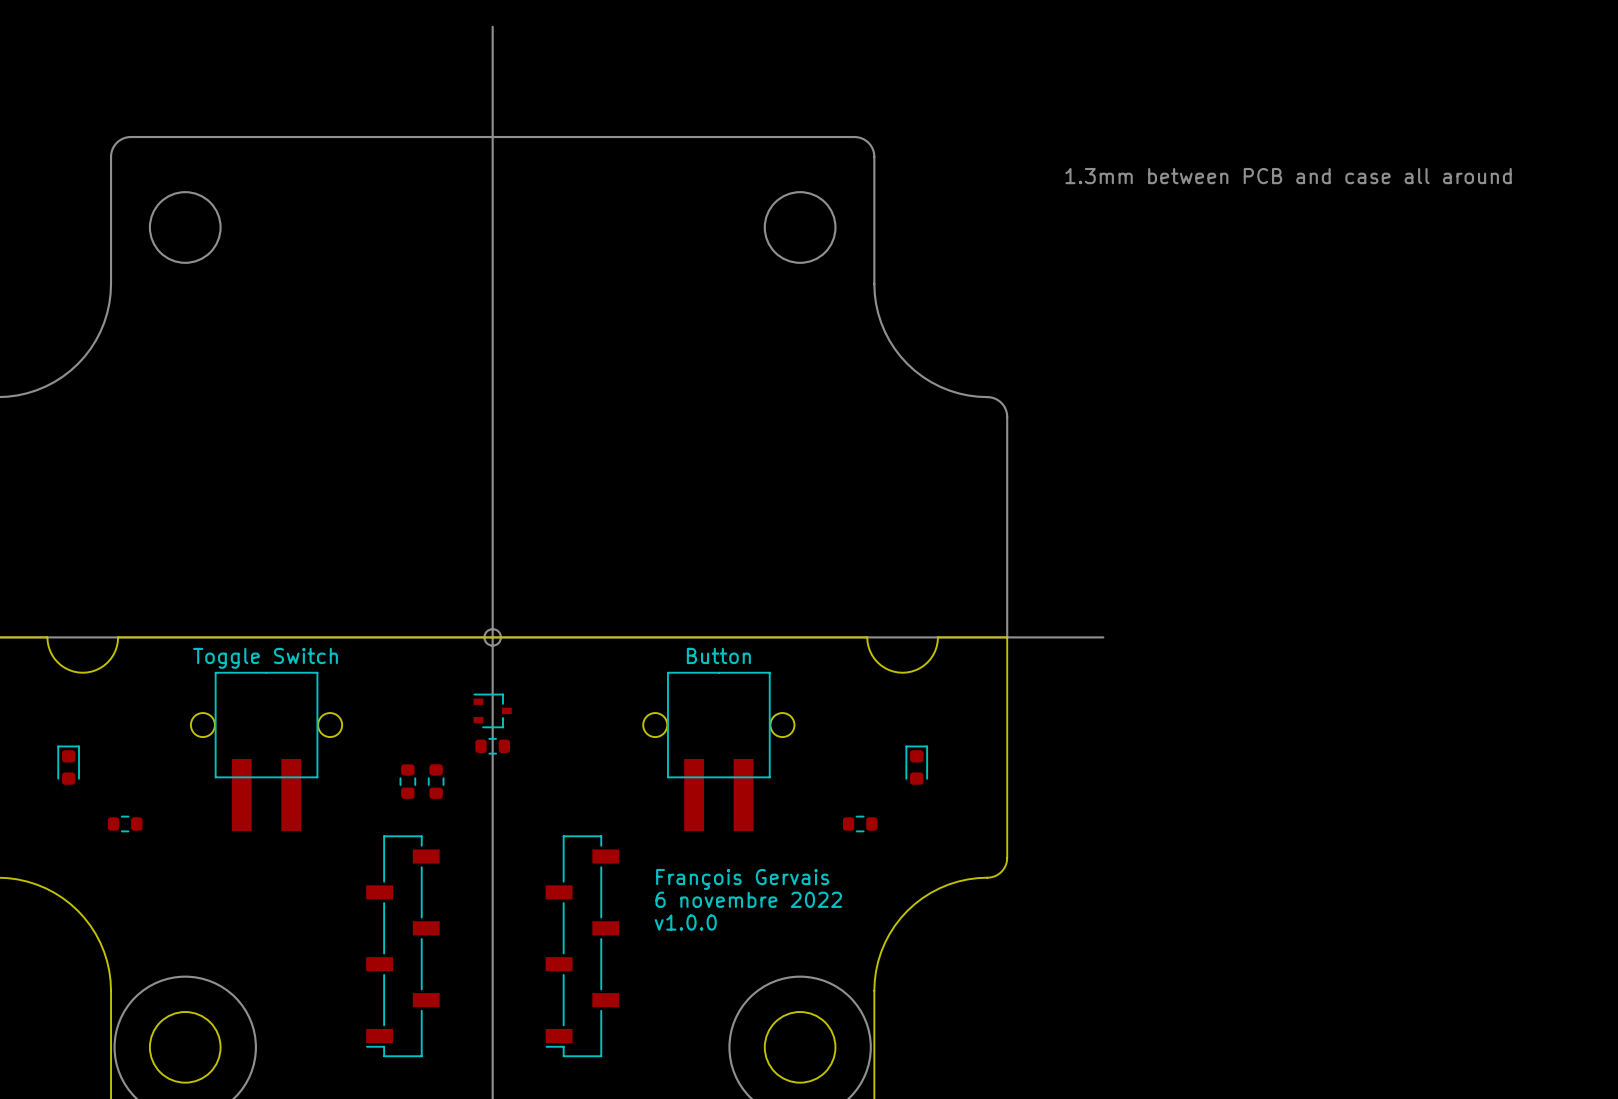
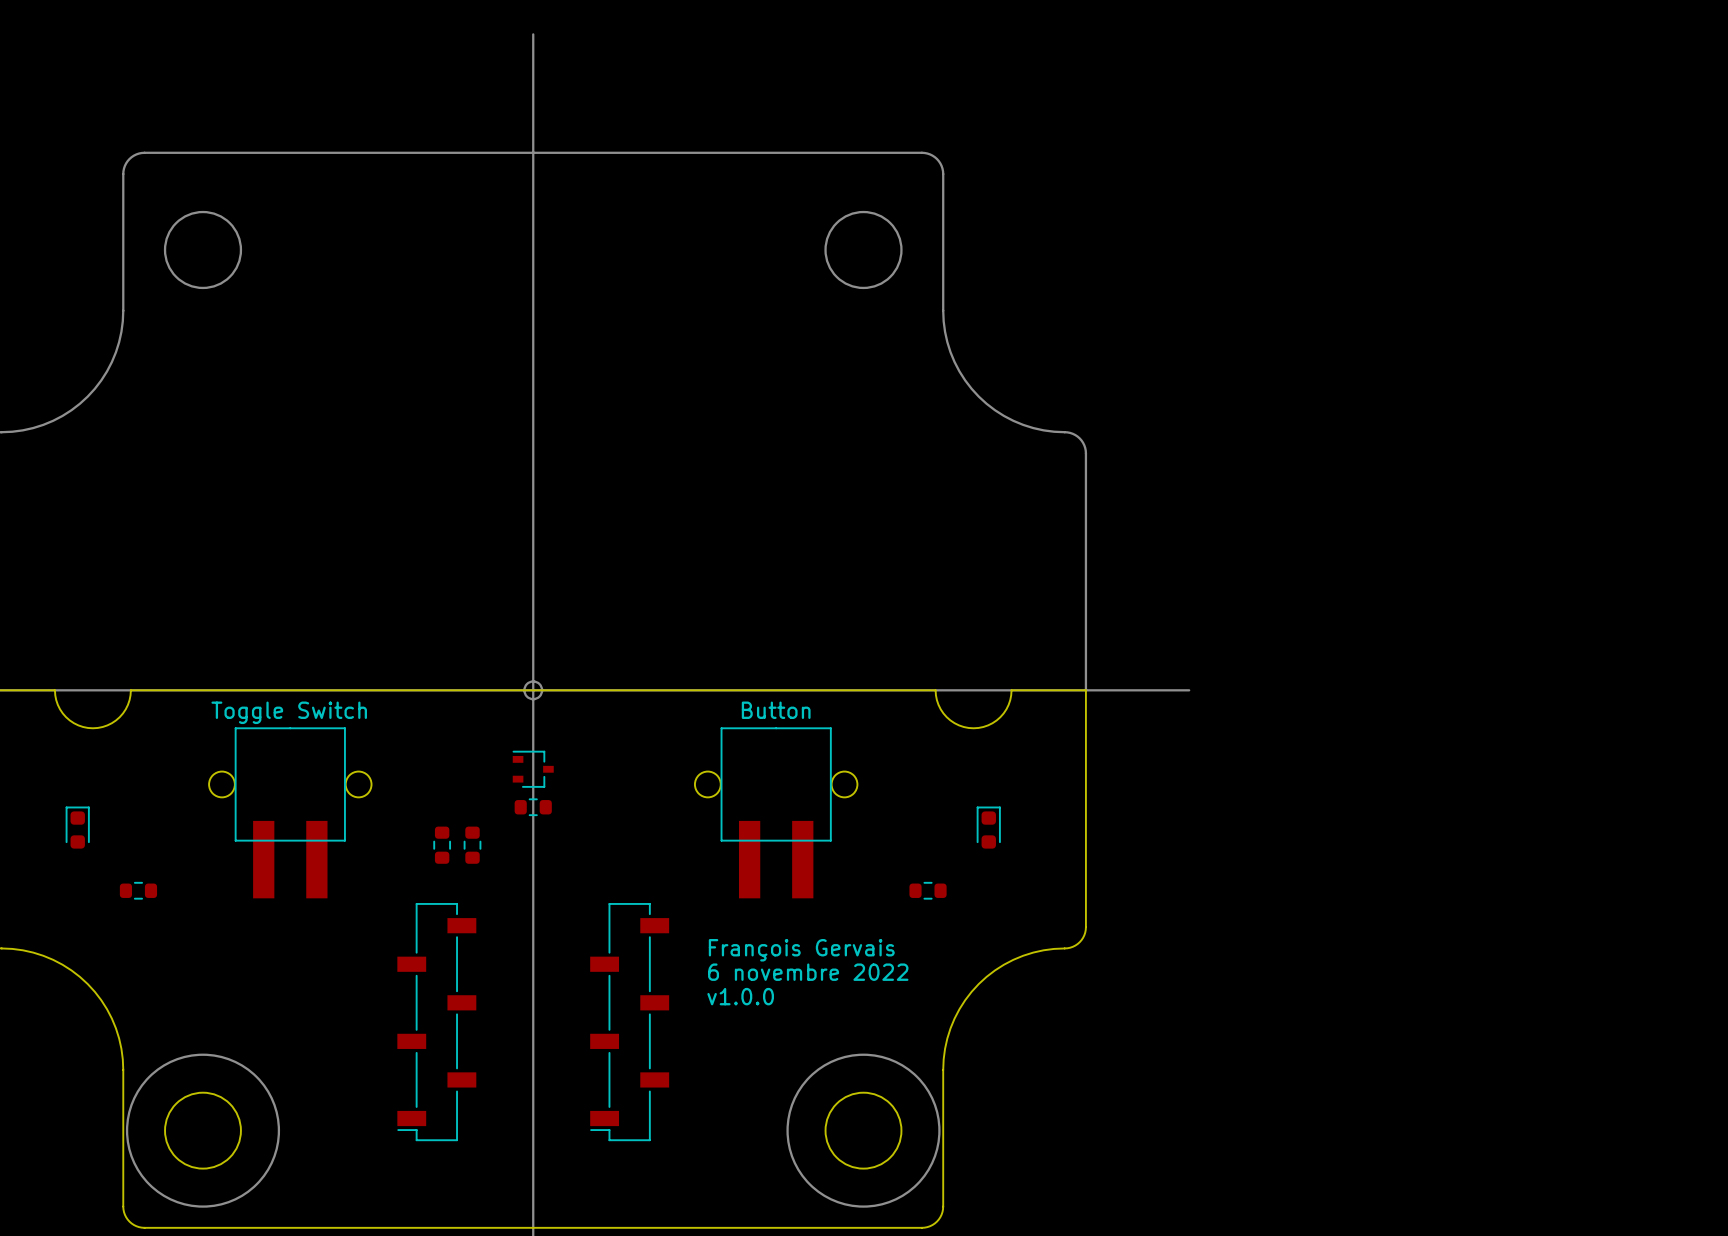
text: 1.3mm between PCB and case all around (1288, 176) -> none

